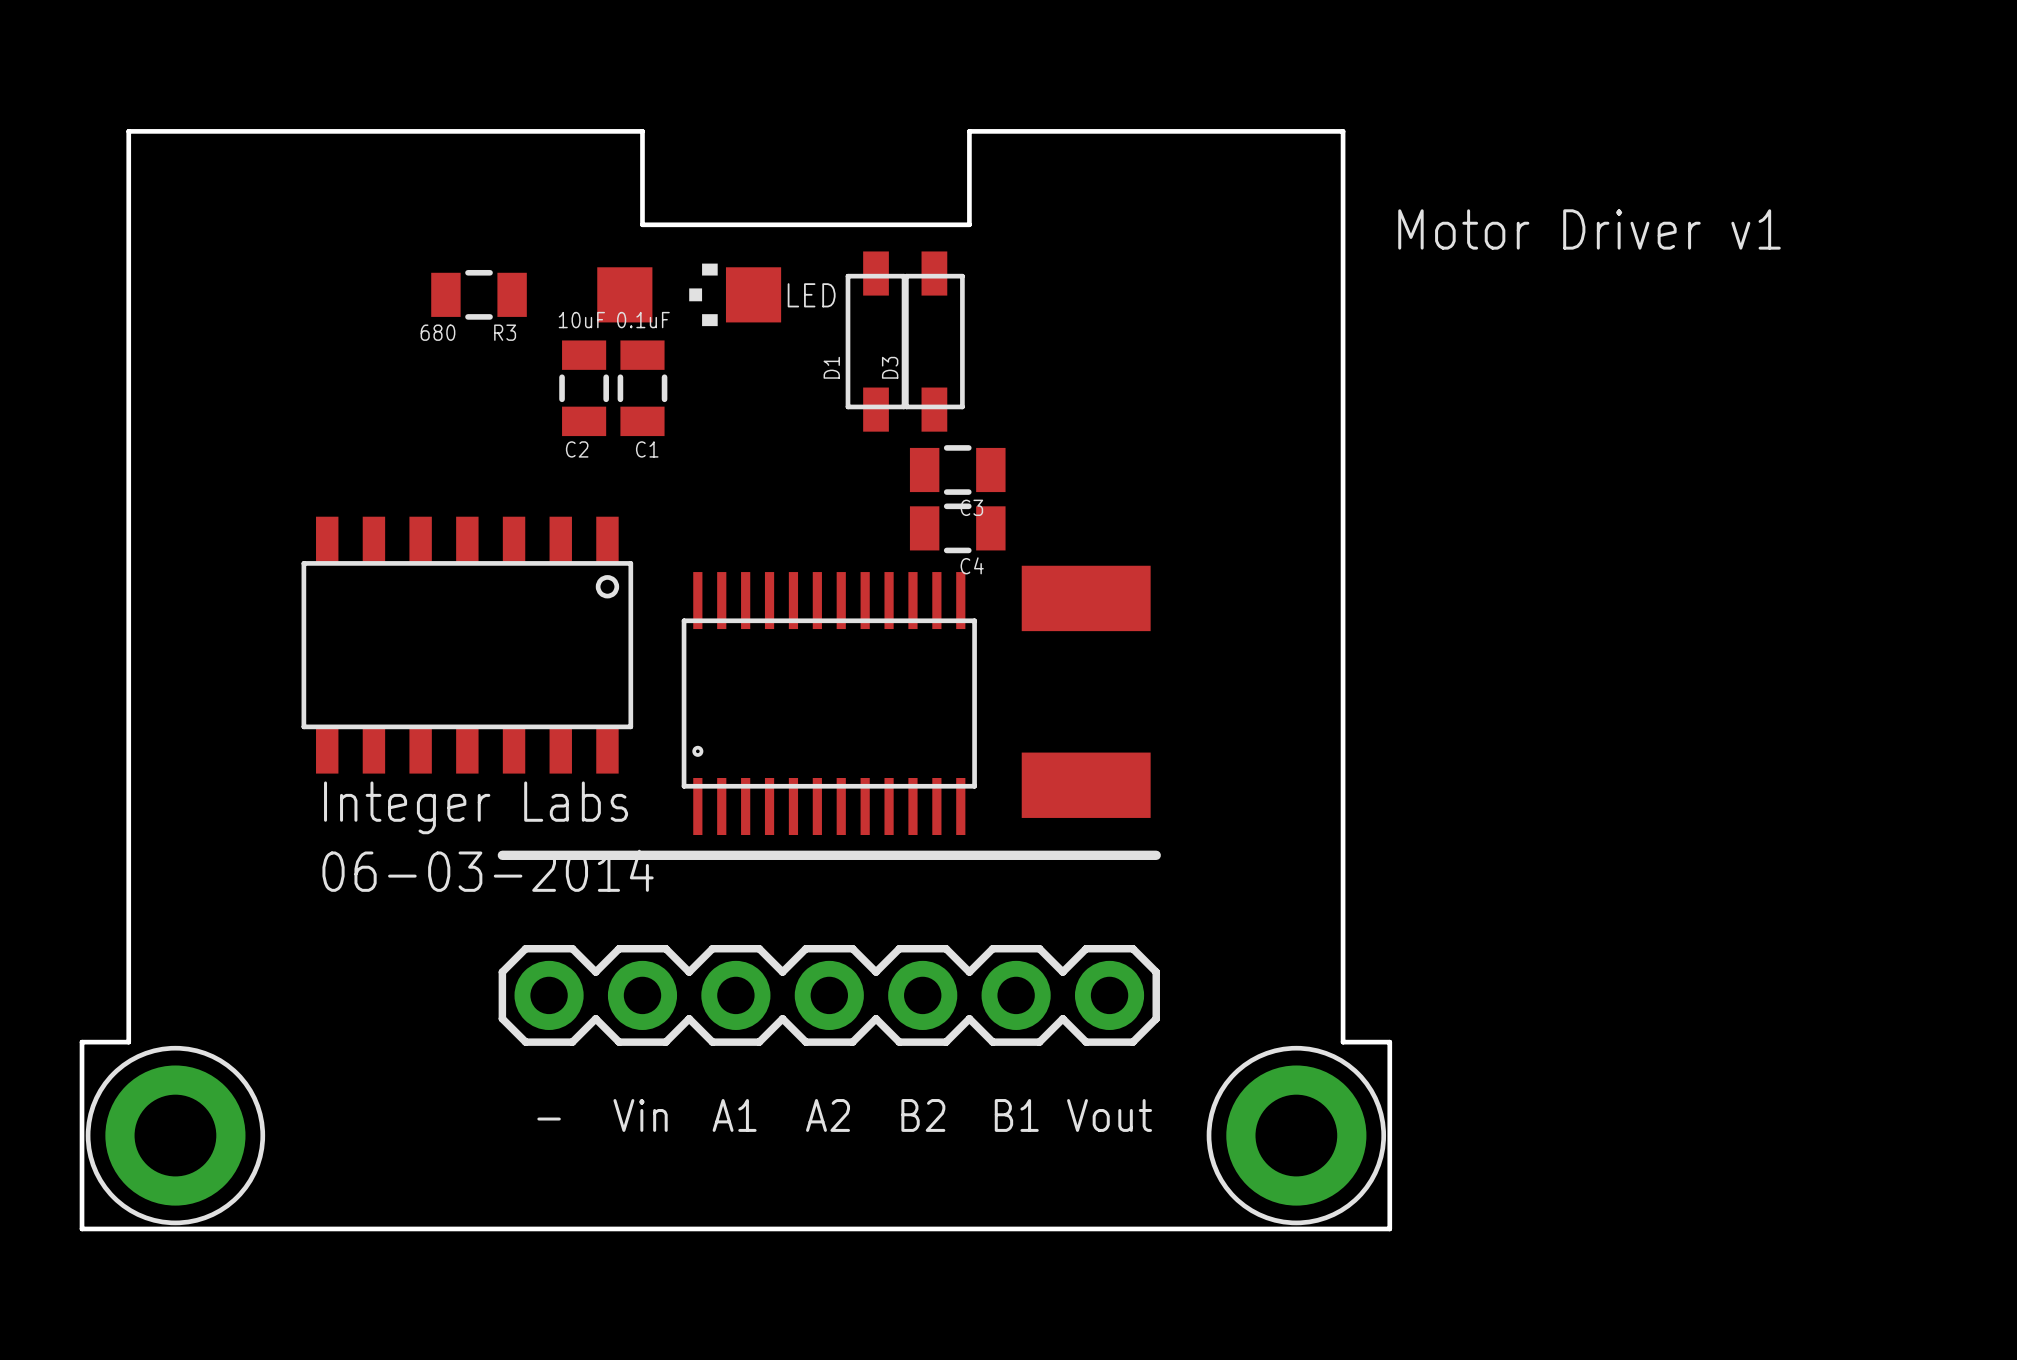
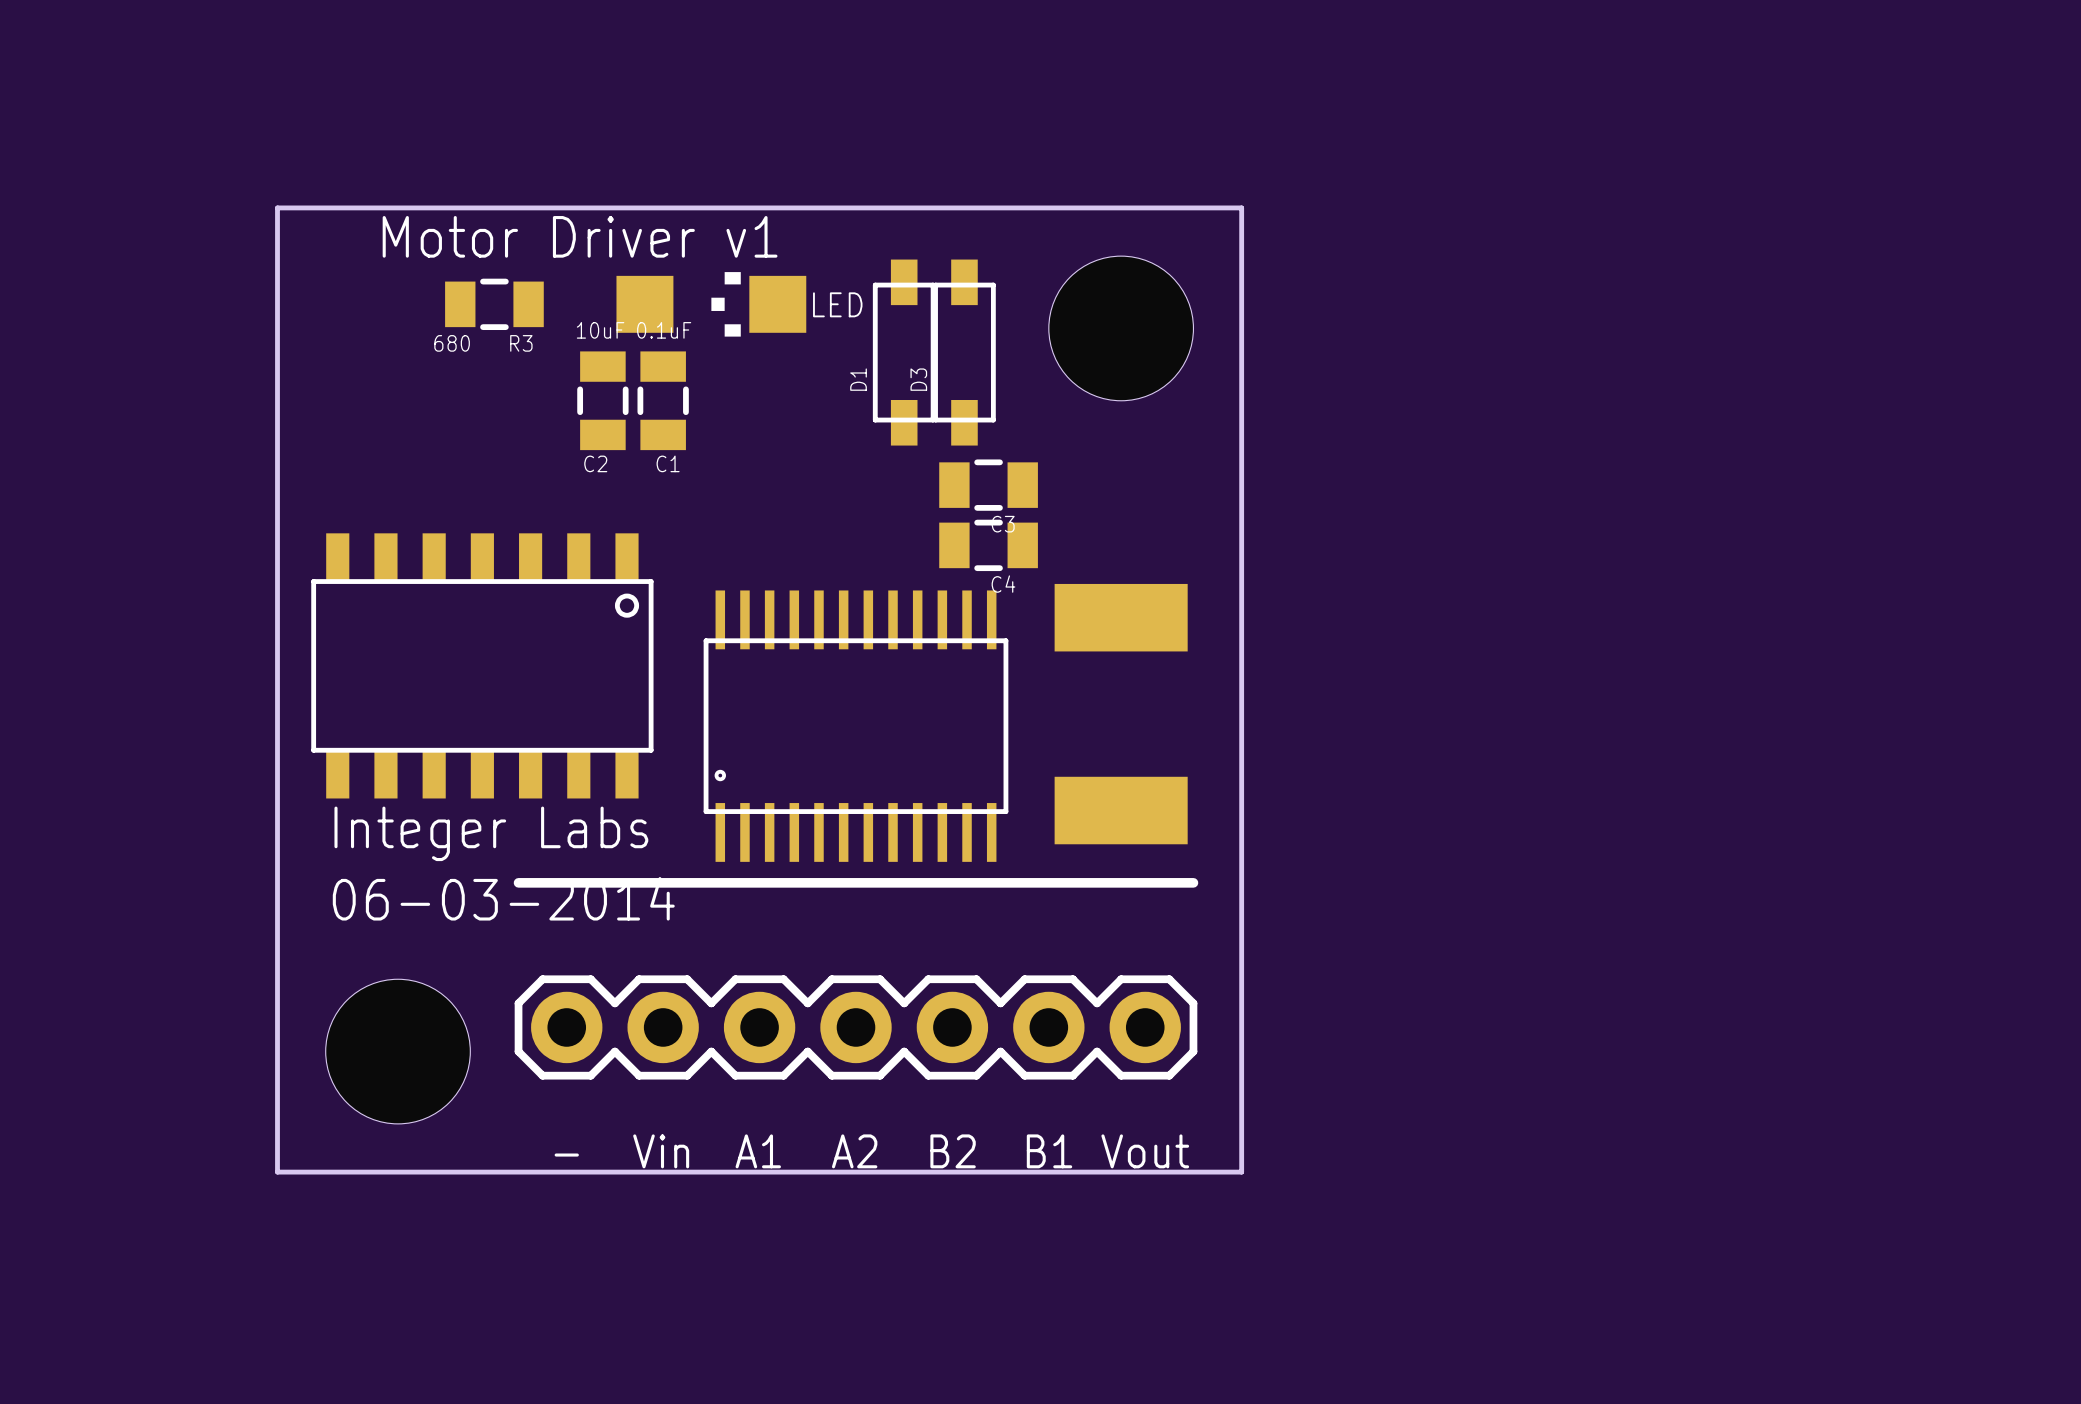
part footprint: [79, 129, 1393, 1232] -> [275, 205, 1245, 1175]
text: none -> Motor Driver v1 (580, 236)
text: Motor Driver v1 (1589, 229) -> none

